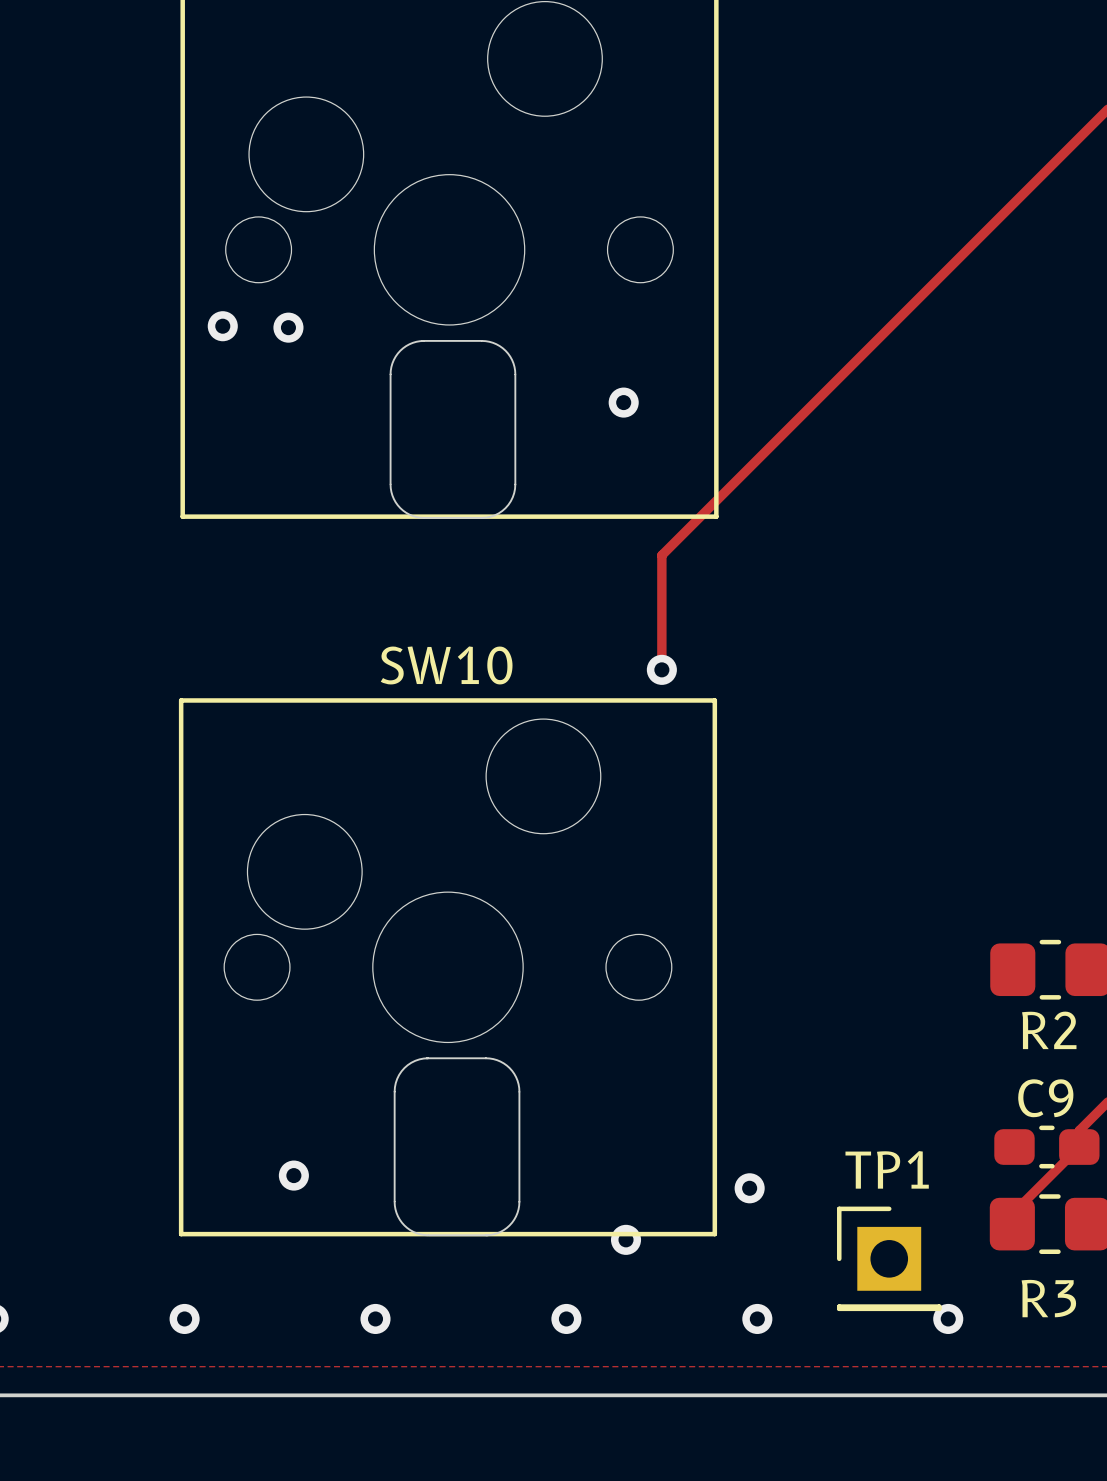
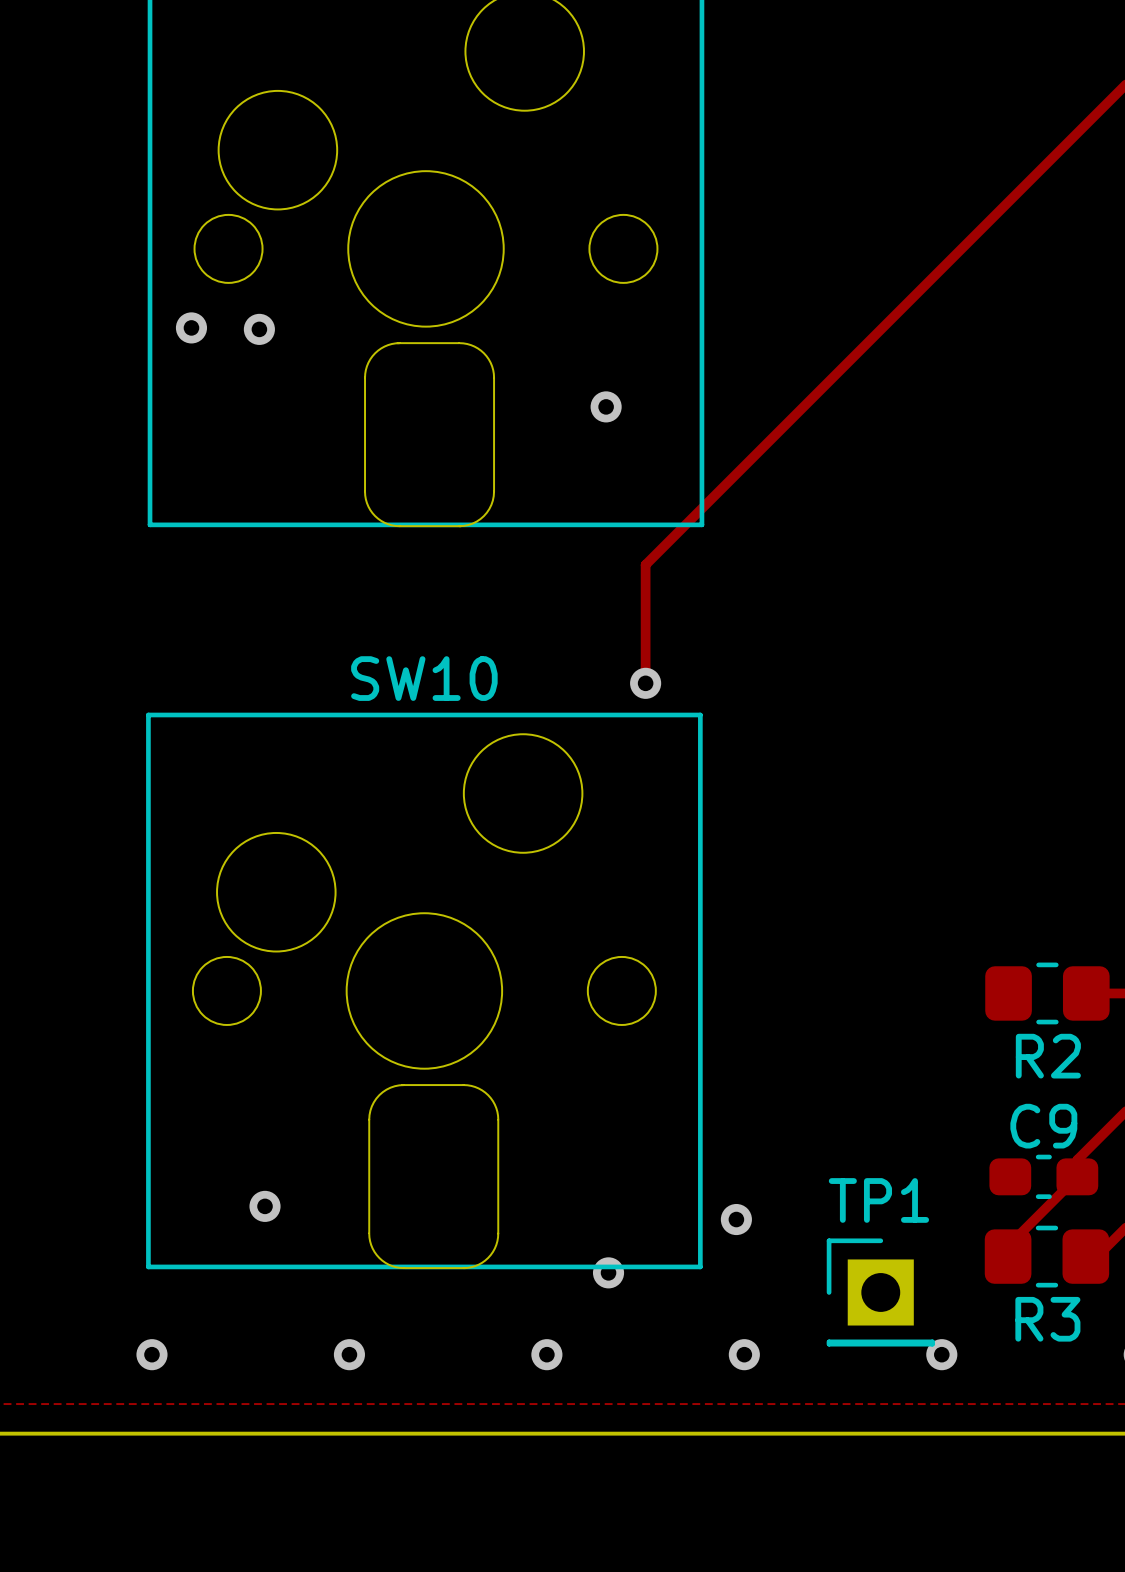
R3 name position: R3 (1048, 1298) -> R3 (1047, 1319)

